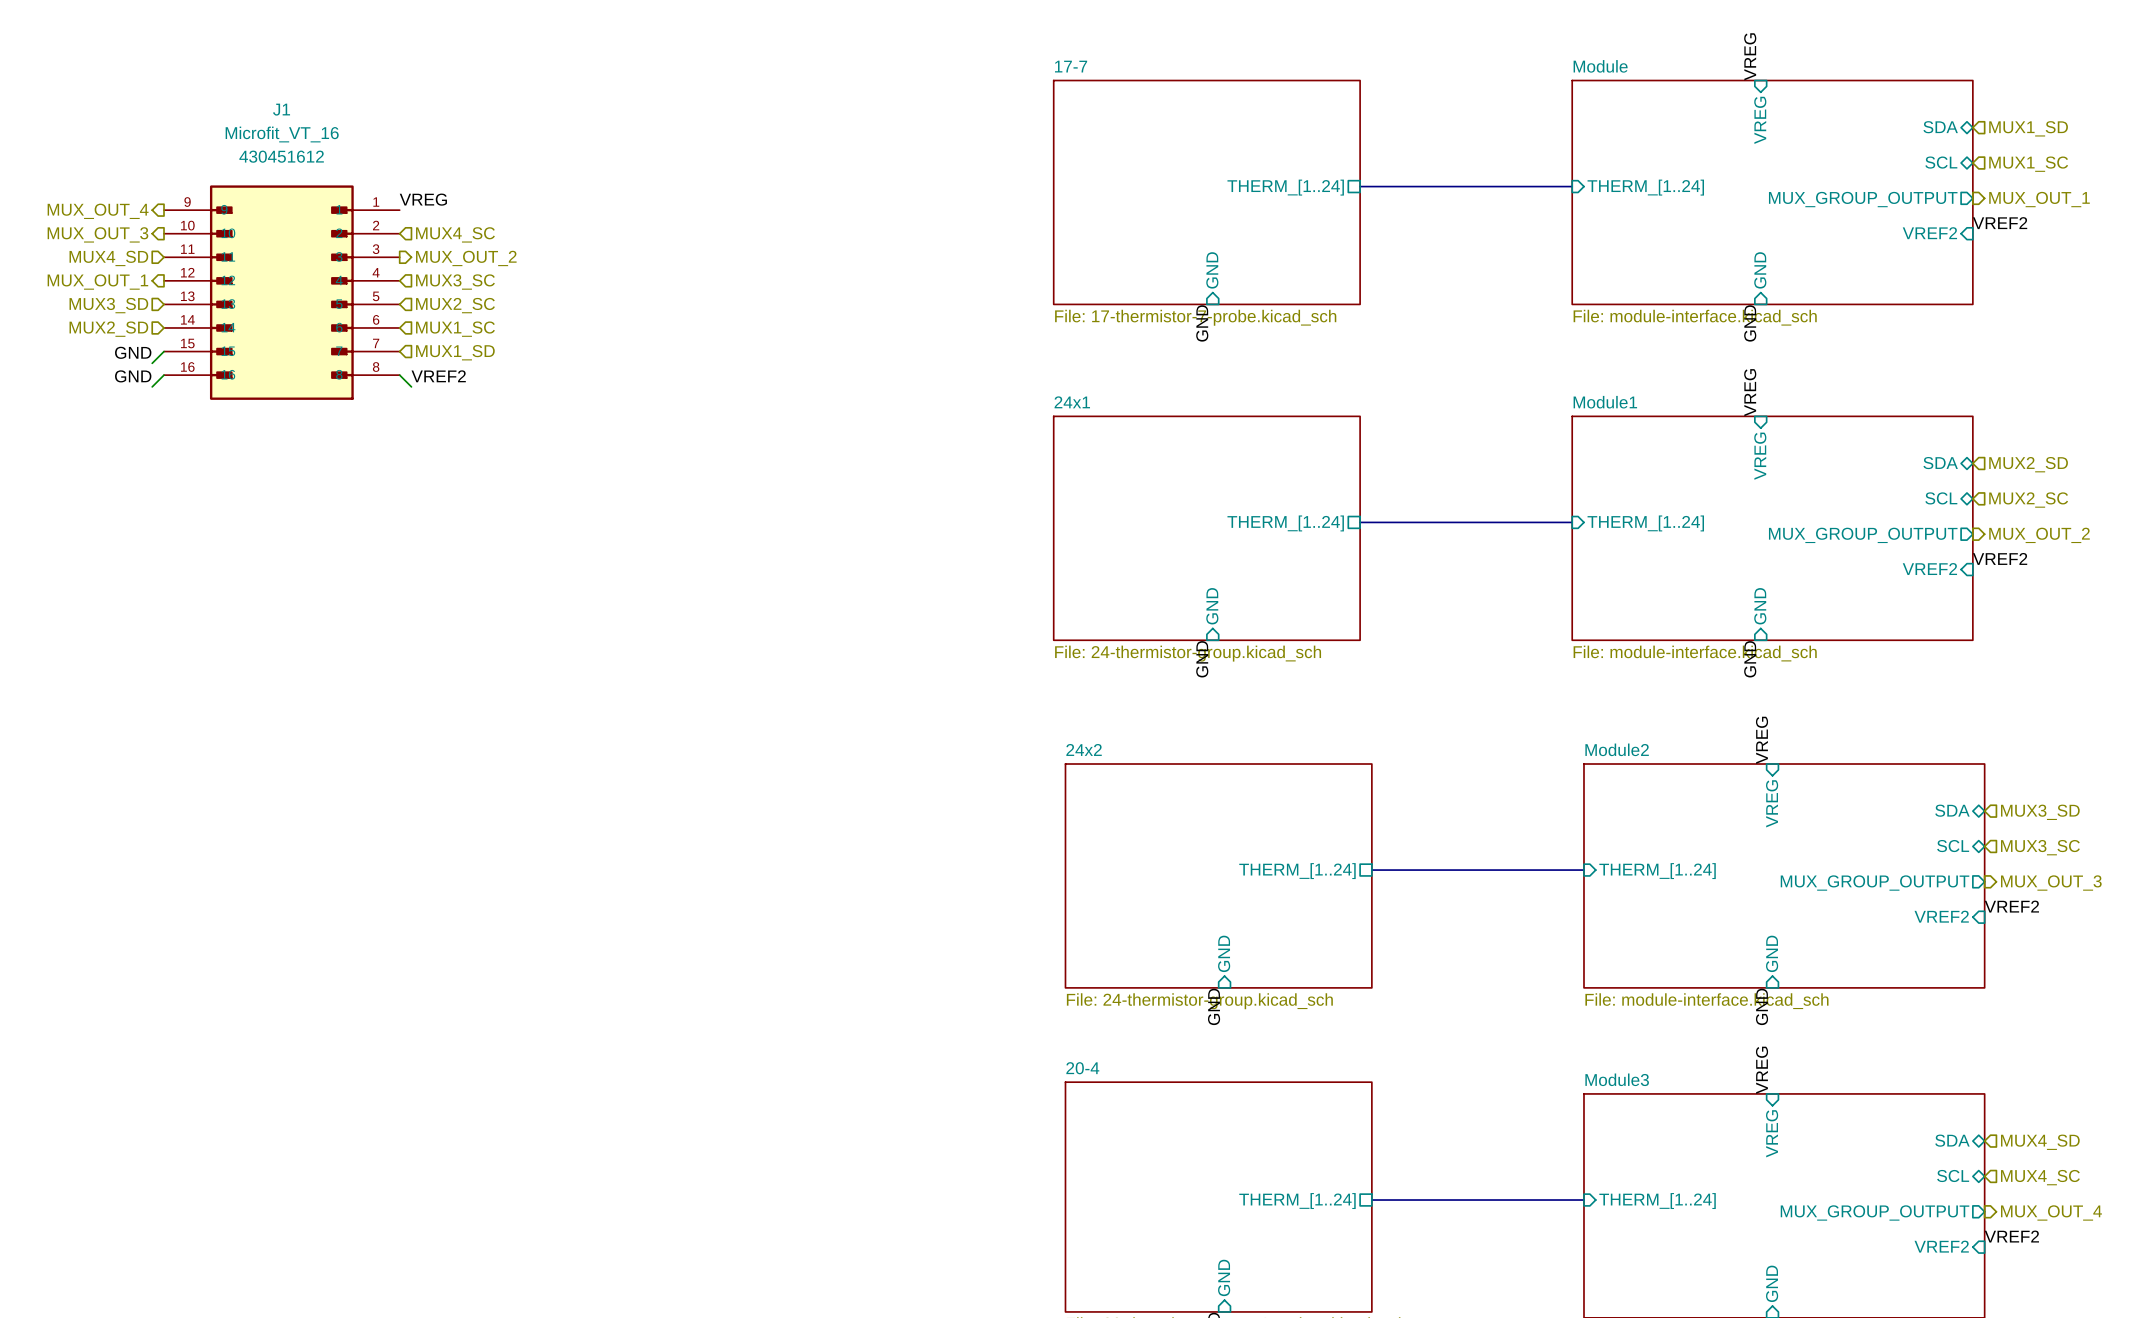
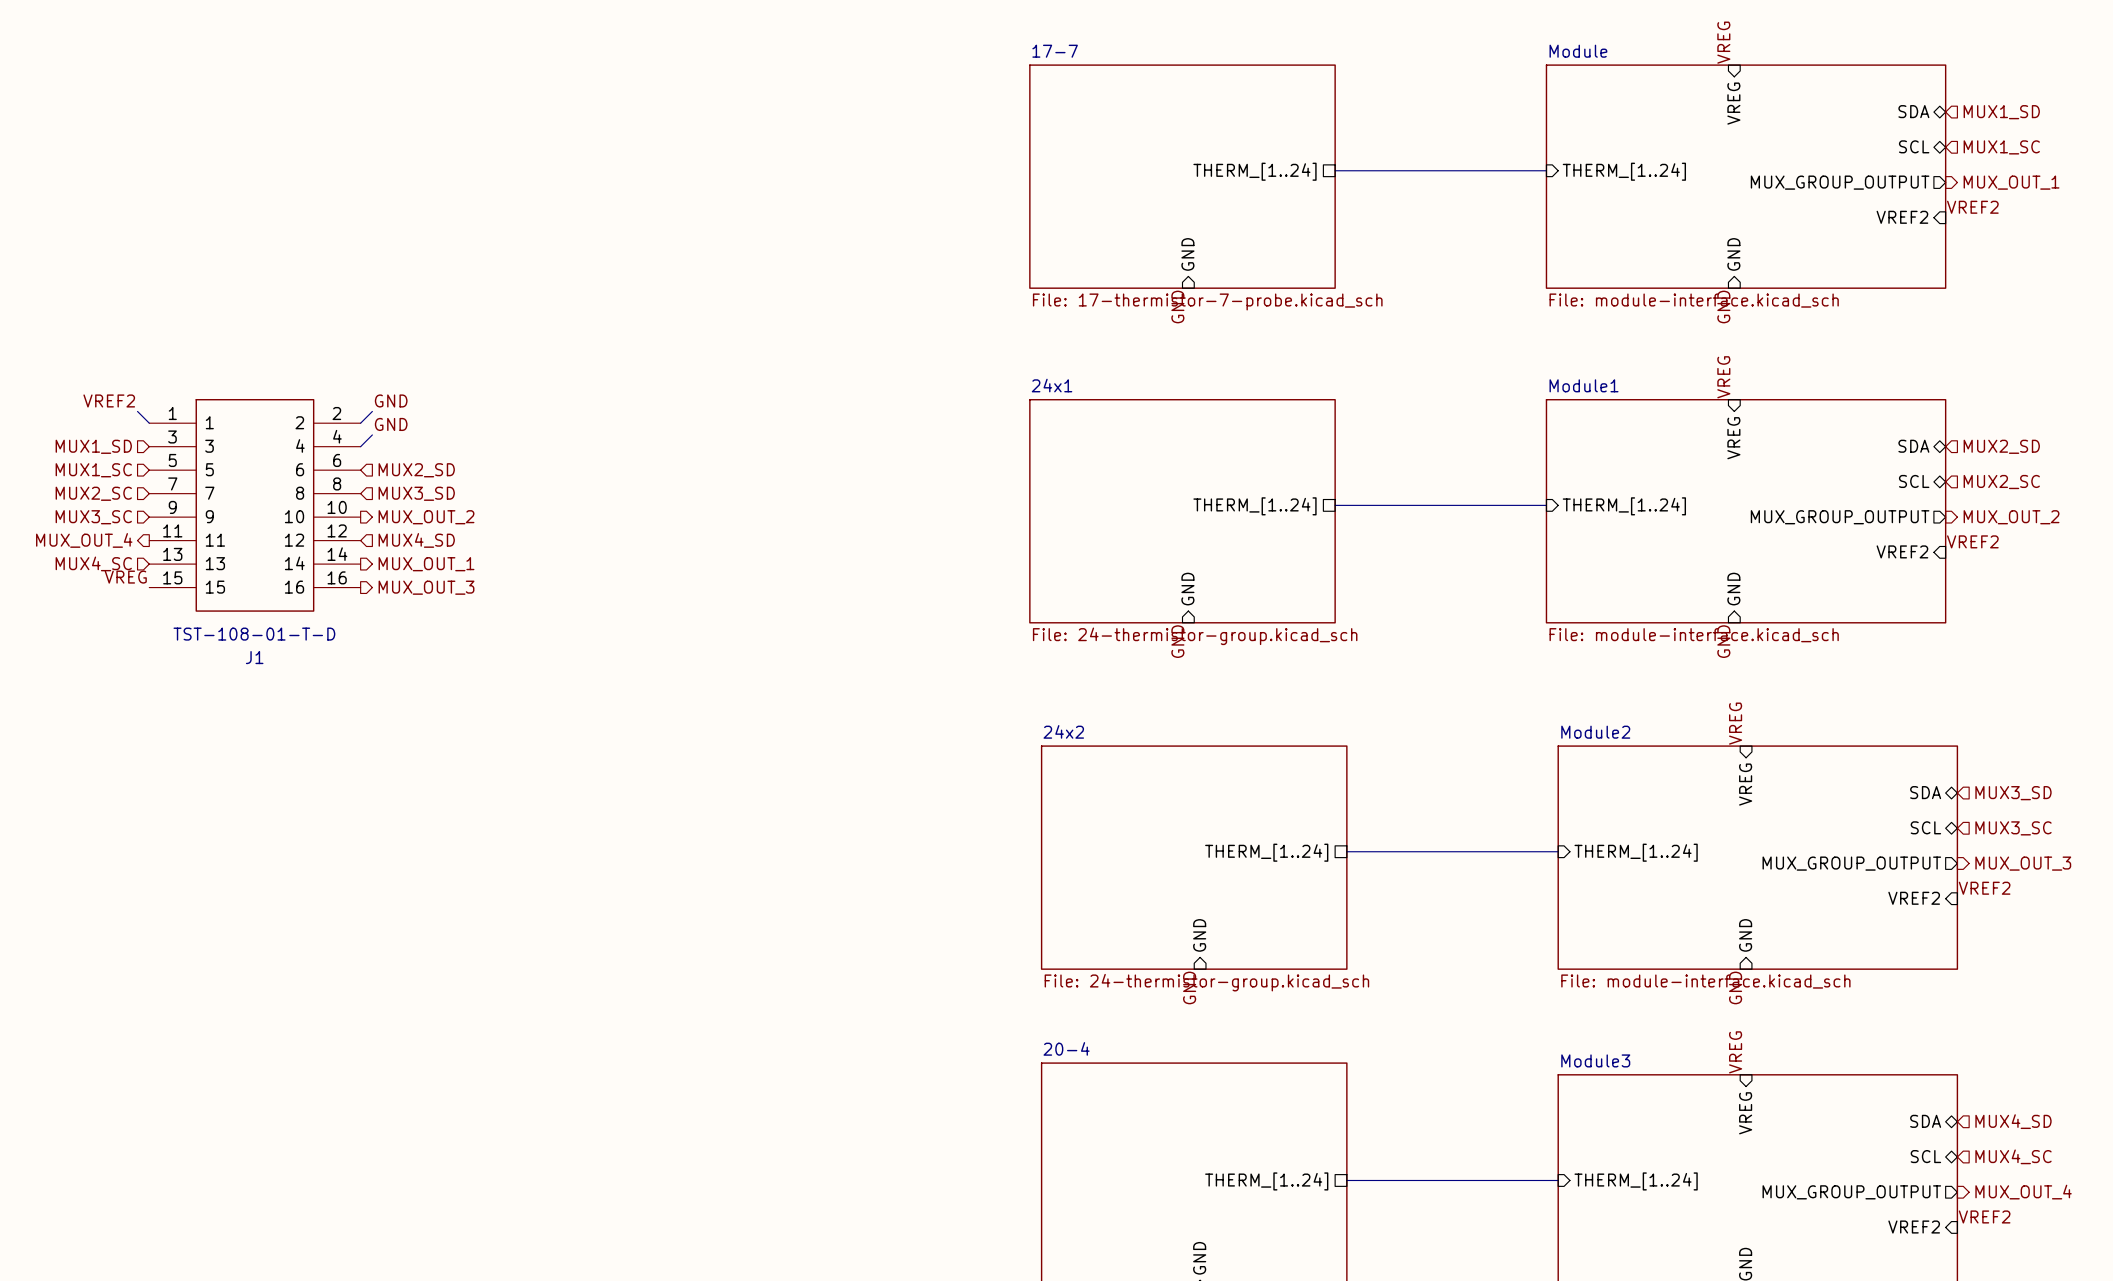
J1 name position: J1 (281, 109) -> J1 (254, 657)
J1 value: Microfit_VT_16 (282, 134) -> TST-108-01-T-D (254, 634)
J1 text: 430451612 (281, 156) -> none
J1 symbol: [164, 185, 400, 400] -> [149, 399, 361, 612]
label: VREG (423, 199) -> none
hierarchical label: MUX_OUT_4 (98, 211) -> none
hierarchical label: MUX_OUT_3 (97, 234) -> none
hierarchical label: MUX4_SC (455, 234) -> none
hierarchical label: MUX4_SD (108, 258) -> none
hierarchical label: MUX_OUT_2 (466, 258) -> none
hierarchical label: MUX_OUT_1 (97, 282) -> none
hierarchical label: MUX3_SC (455, 282) -> none
hierarchical label: MUX3_SD (108, 305) -> none
hierarchical label: MUX2_SC (455, 305) -> none
hierarchical label: MUX2_SD (108, 329) -> none
hierarchical label: MUX1_SC (455, 329) -> none
wire: (164, 351) (152, 363) -> none
label: GND (133, 352) -> none
hierarchical label: MUX1_SD (455, 352) -> none
wire: (164, 375) (152, 386) -> none
wire: (399, 375) (411, 386) -> none
label: GND (133, 376) -> none
label: VREF2 (438, 376) -> none
label: none -> VREF2 (109, 400)
label: none -> GND (391, 400)
wire: none -> (137, 411) (149, 423)
wire: none -> (372, 411) (360, 423)
label: none -> GND (391, 424)
wire: none -> (372, 434) (360, 446)
hierarchical label: none -> MUX1_SD (93, 446)
hierarchical label: none -> MUX1_SC (93, 470)
hierarchical label: none -> MUX2_SD (416, 470)
hierarchical label: none -> MUX2_SC (93, 493)
hierarchical label: none -> MUX3_SD (416, 493)
hierarchical label: none -> MUX3_SC (93, 517)
hierarchical label: none -> MUX_OUT_2 (426, 517)
hierarchical label: none -> MUX_OUT_4 (84, 540)
hierarchical label: none -> MUX4_SD (416, 540)
hierarchical label: none -> MUX4_SC (93, 563)
hierarchical label: none -> MUX_OUT_1 (426, 564)
label: none -> VREG (125, 577)
hierarchical label: none -> MUX_OUT_3 (426, 587)

